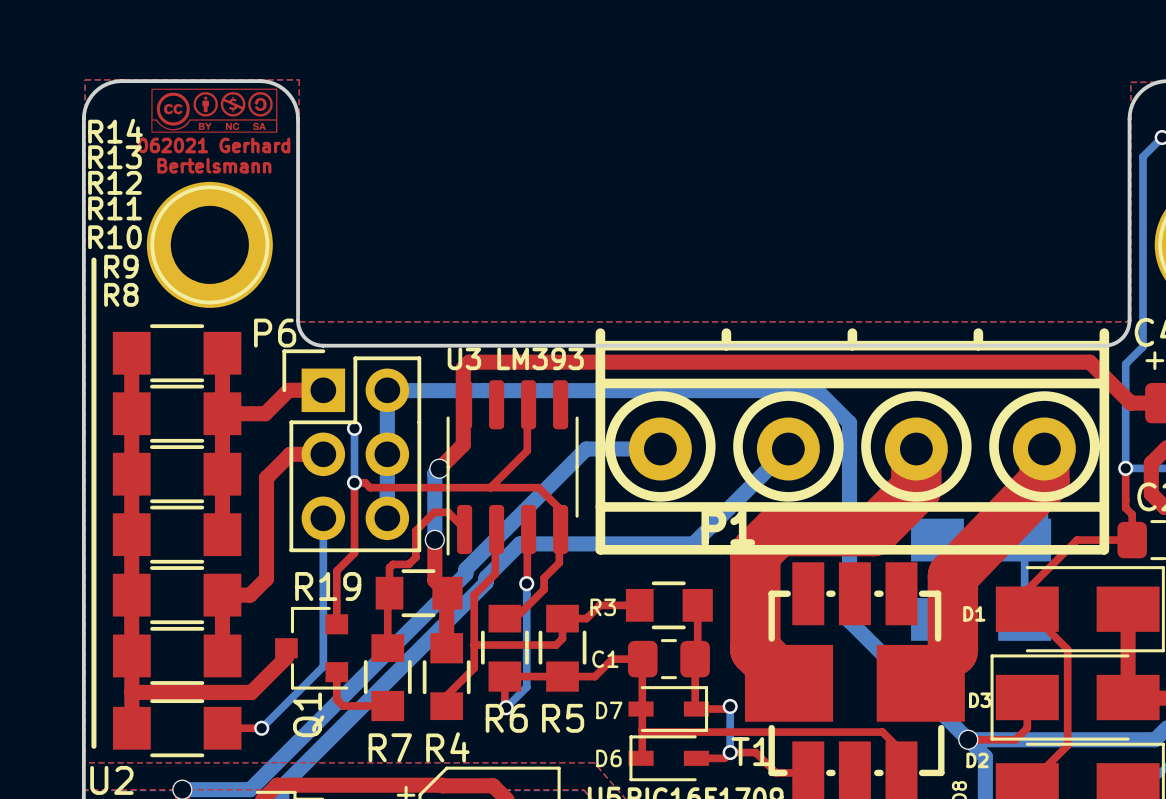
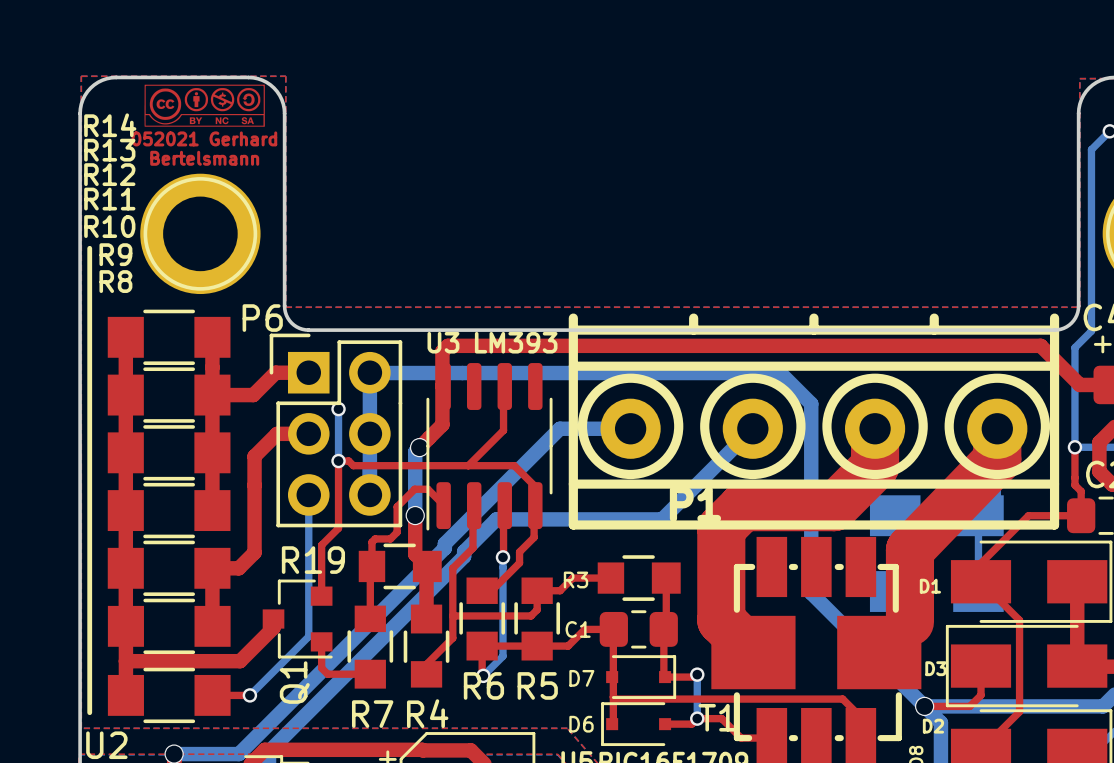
text: 062021 Gerhard (214, 145) -> 052021 Gerhard (204, 138)
D7 footprint: [628, 686, 710, 732] -> [606, 655, 677, 699]
D6 footprint: [628, 735, 710, 782] -> [601, 702, 672, 747]

